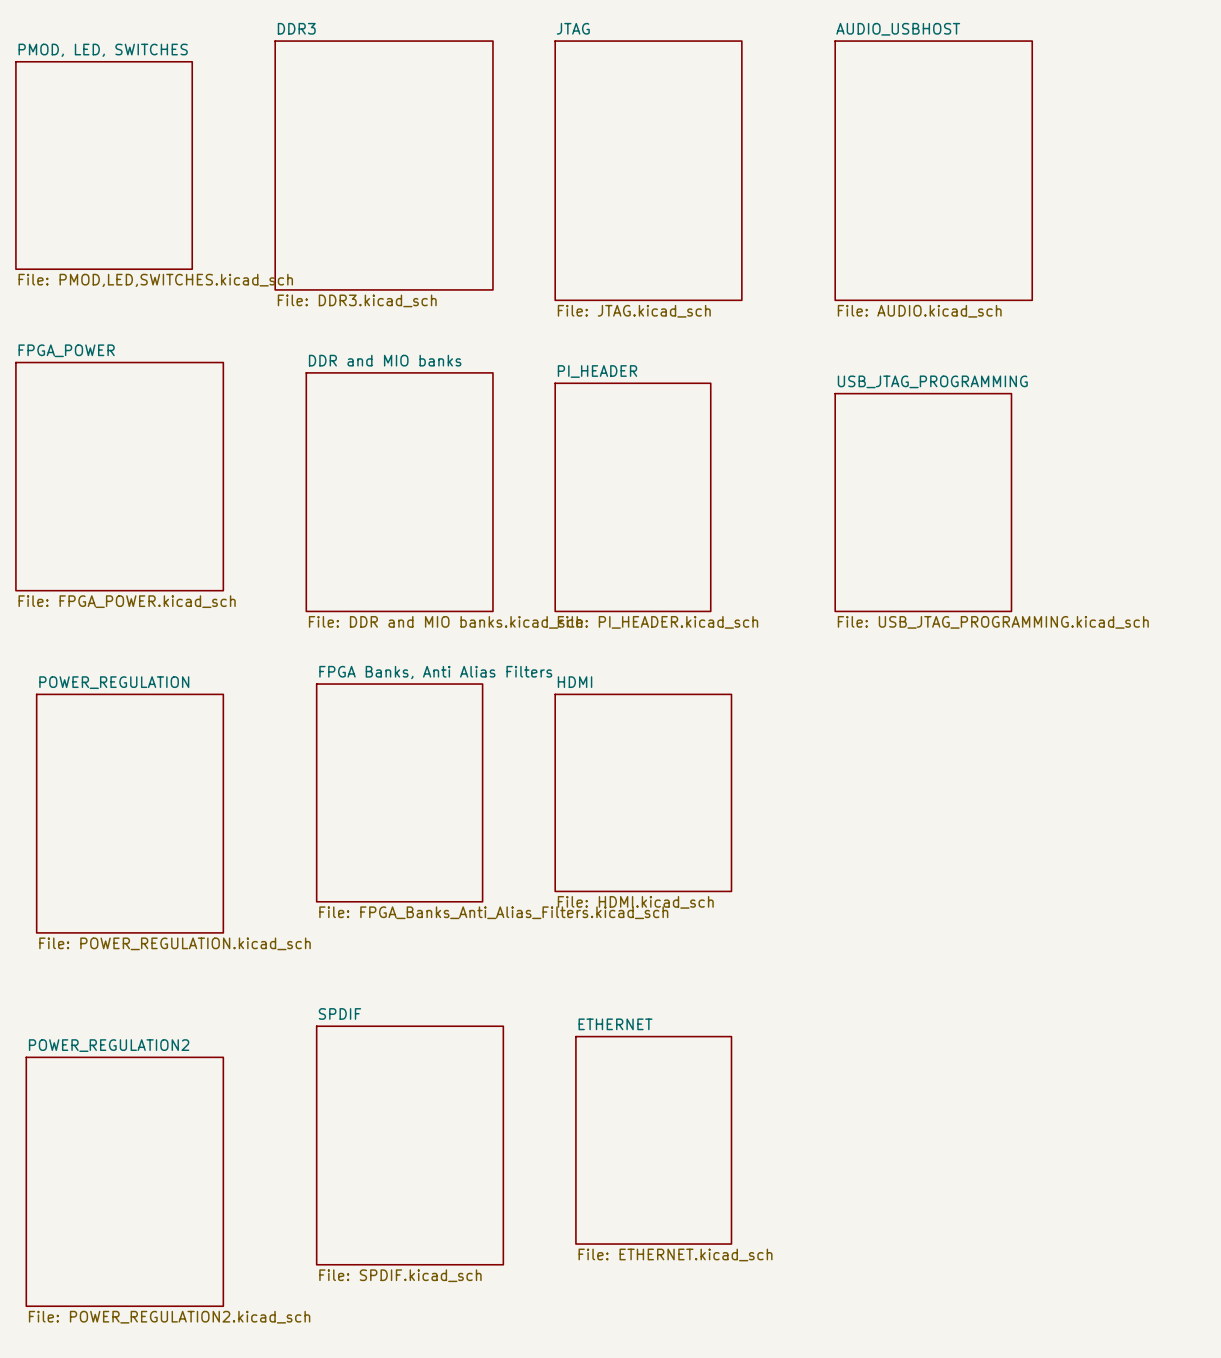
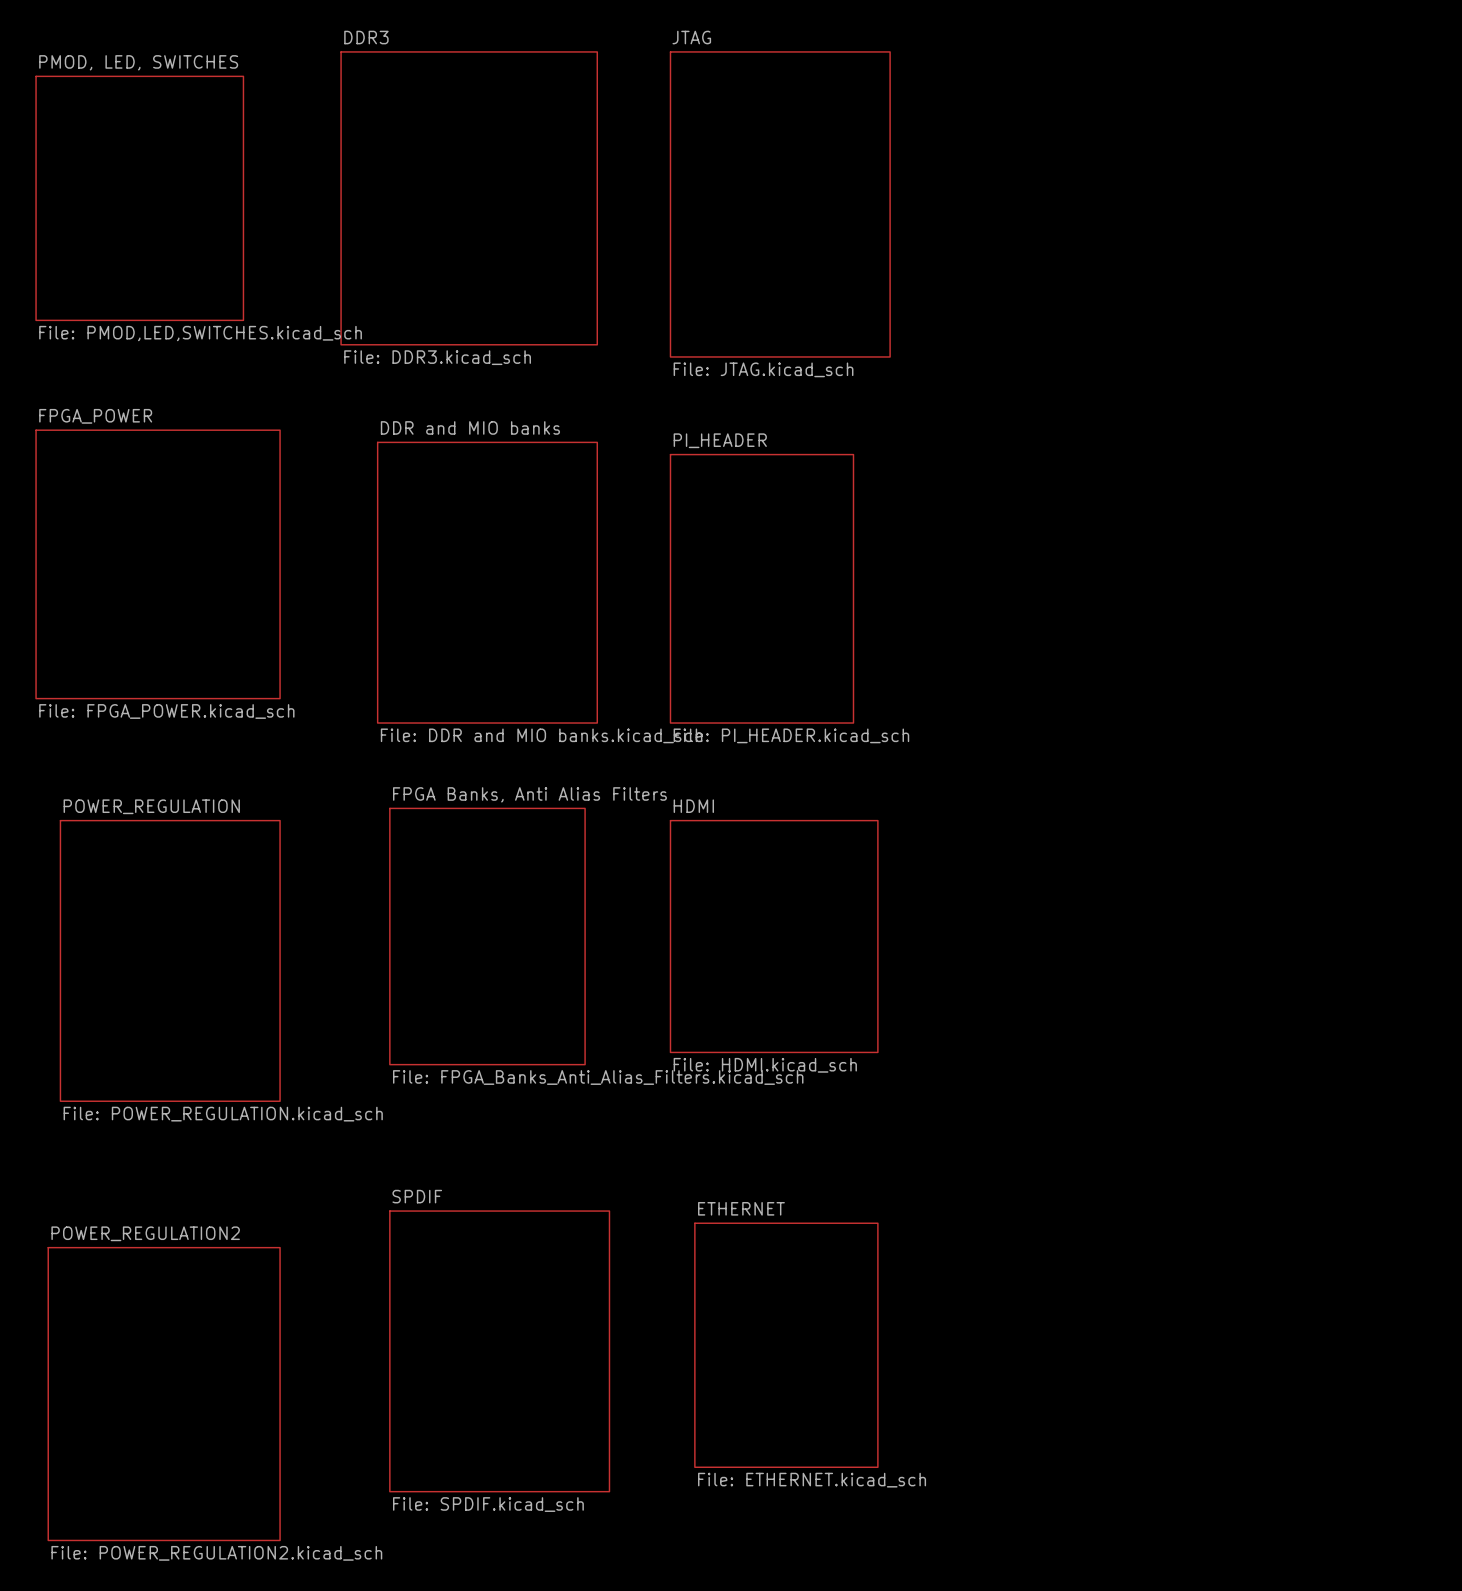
sheet AUDIO_USBHOST: File: AUDIO.kicad_sch (933, 170) -> none
sheet USB_JTAG_PROGRAMMING: File: USB_JTAG_PROGRAMMING.kicad_sch (923, 502) -> none

